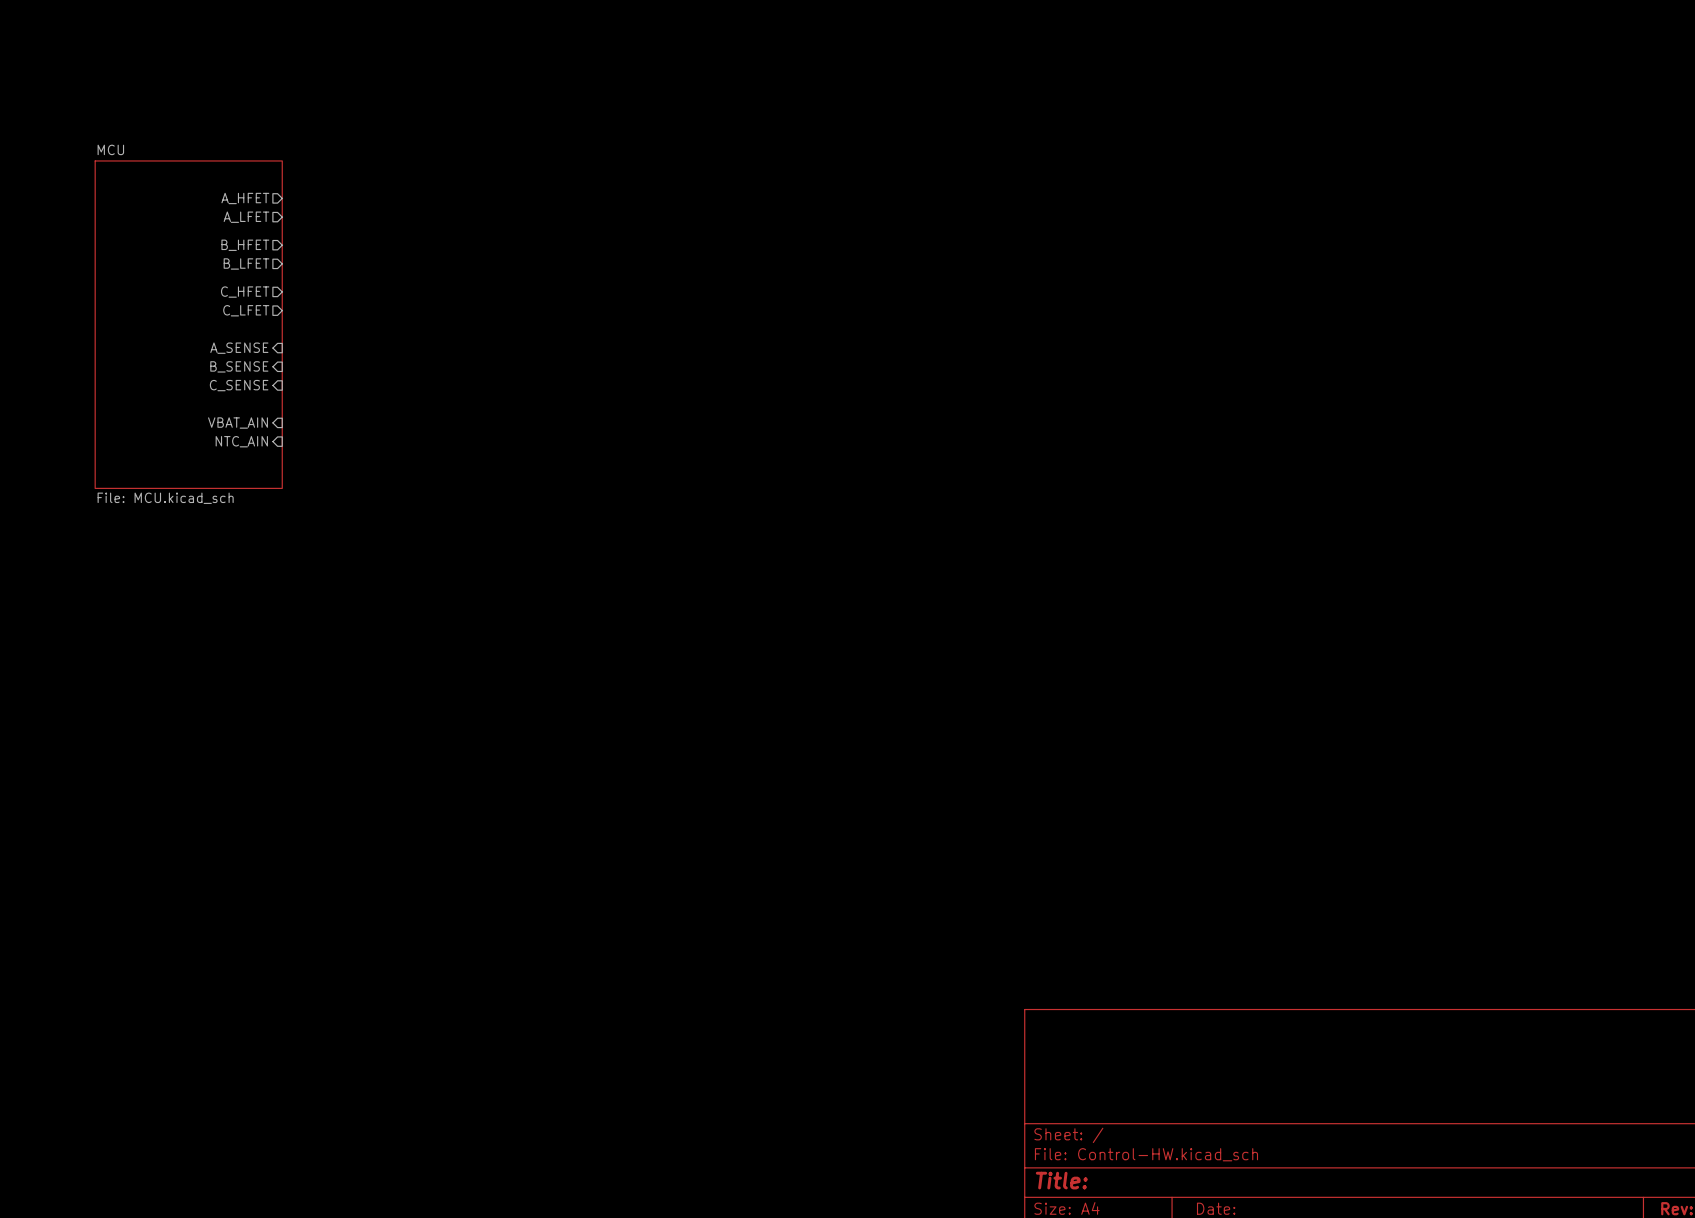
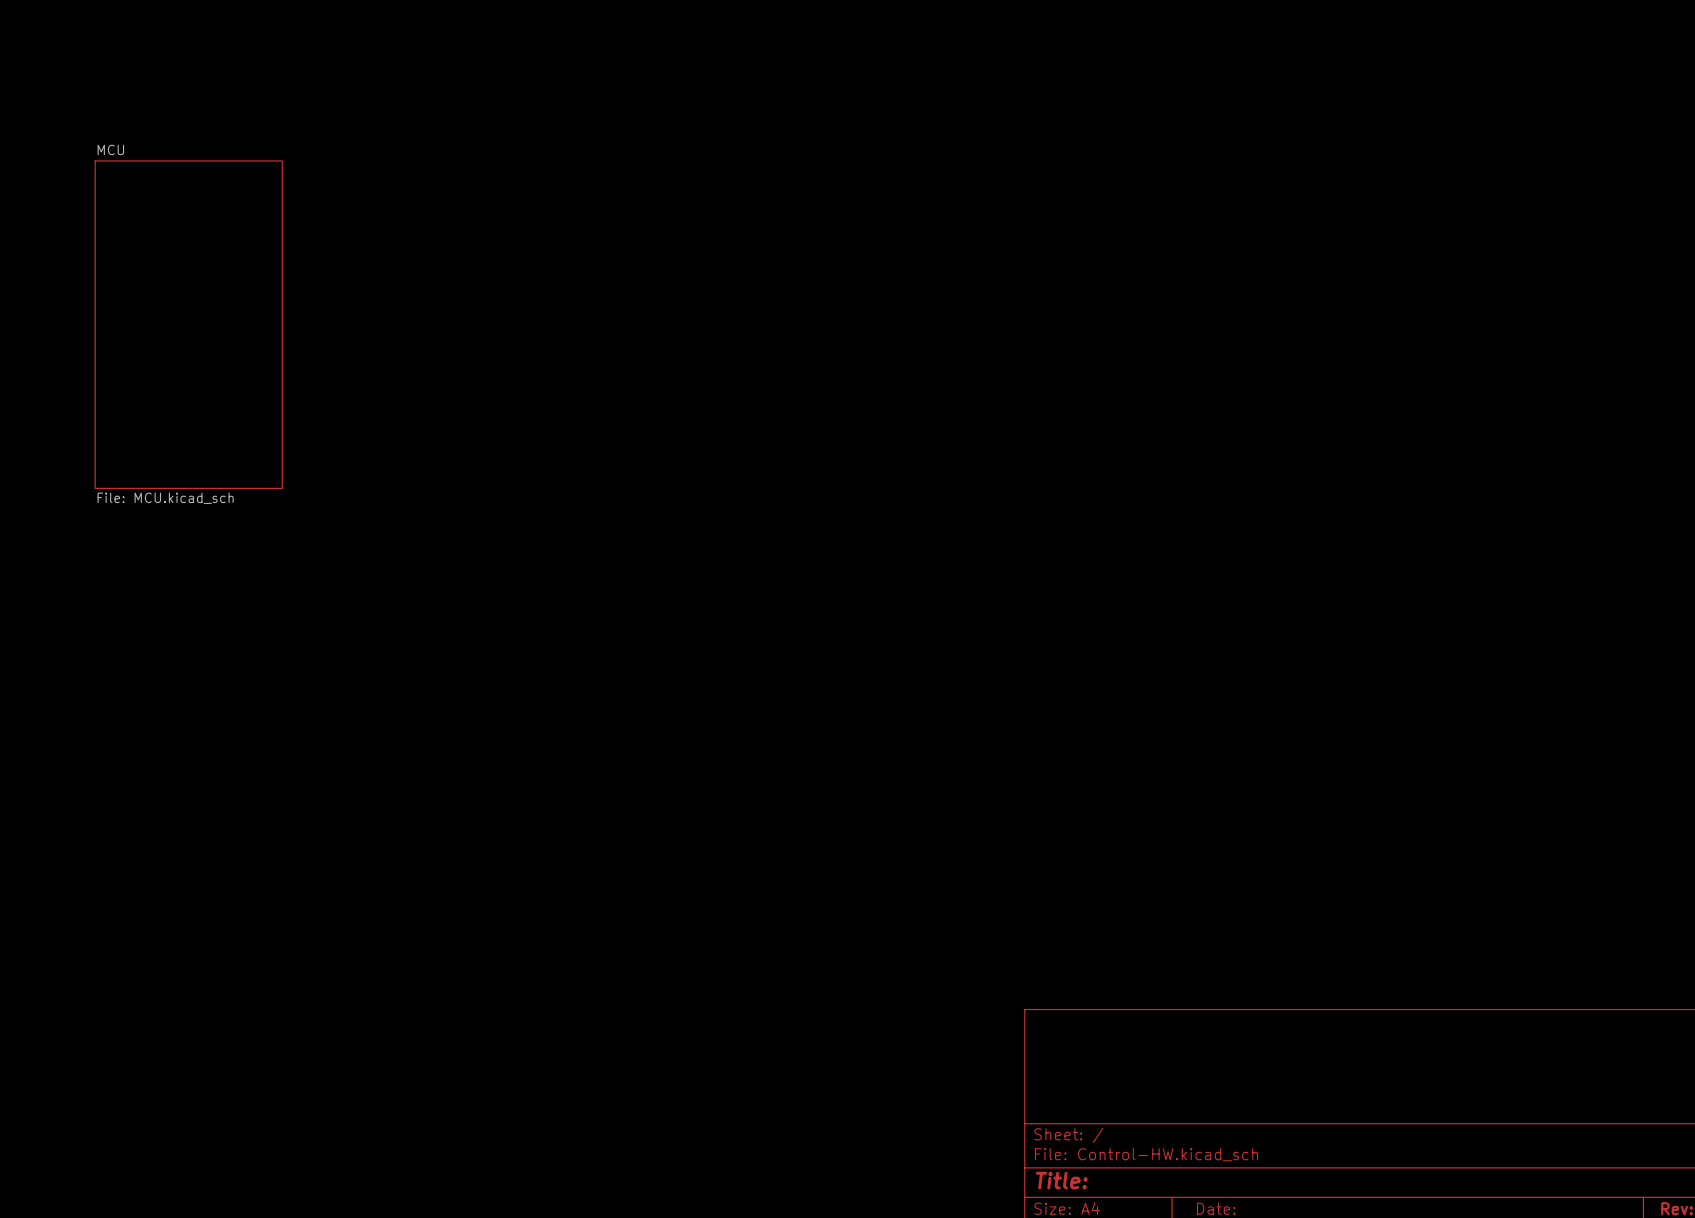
sheet pin: A_HFET (245, 198) -> none
sheet pin: A_LFET (246, 217) -> none
sheet pin: B_HFET (245, 245) -> none
sheet pin: B_LFET (246, 263) -> none
sheet pin: C_HFET (245, 292) -> none
sheet pin: C_LFET (246, 310) -> none
sheet pin: A_SENSE (239, 348) -> none
sheet pin: B_SENSE (239, 366) -> none
sheet pin: C_SENSE (239, 385) -> none
sheet pin: VBAT_AIN (238, 423) -> none
sheet pin: NTC_AIN (241, 441) -> none

